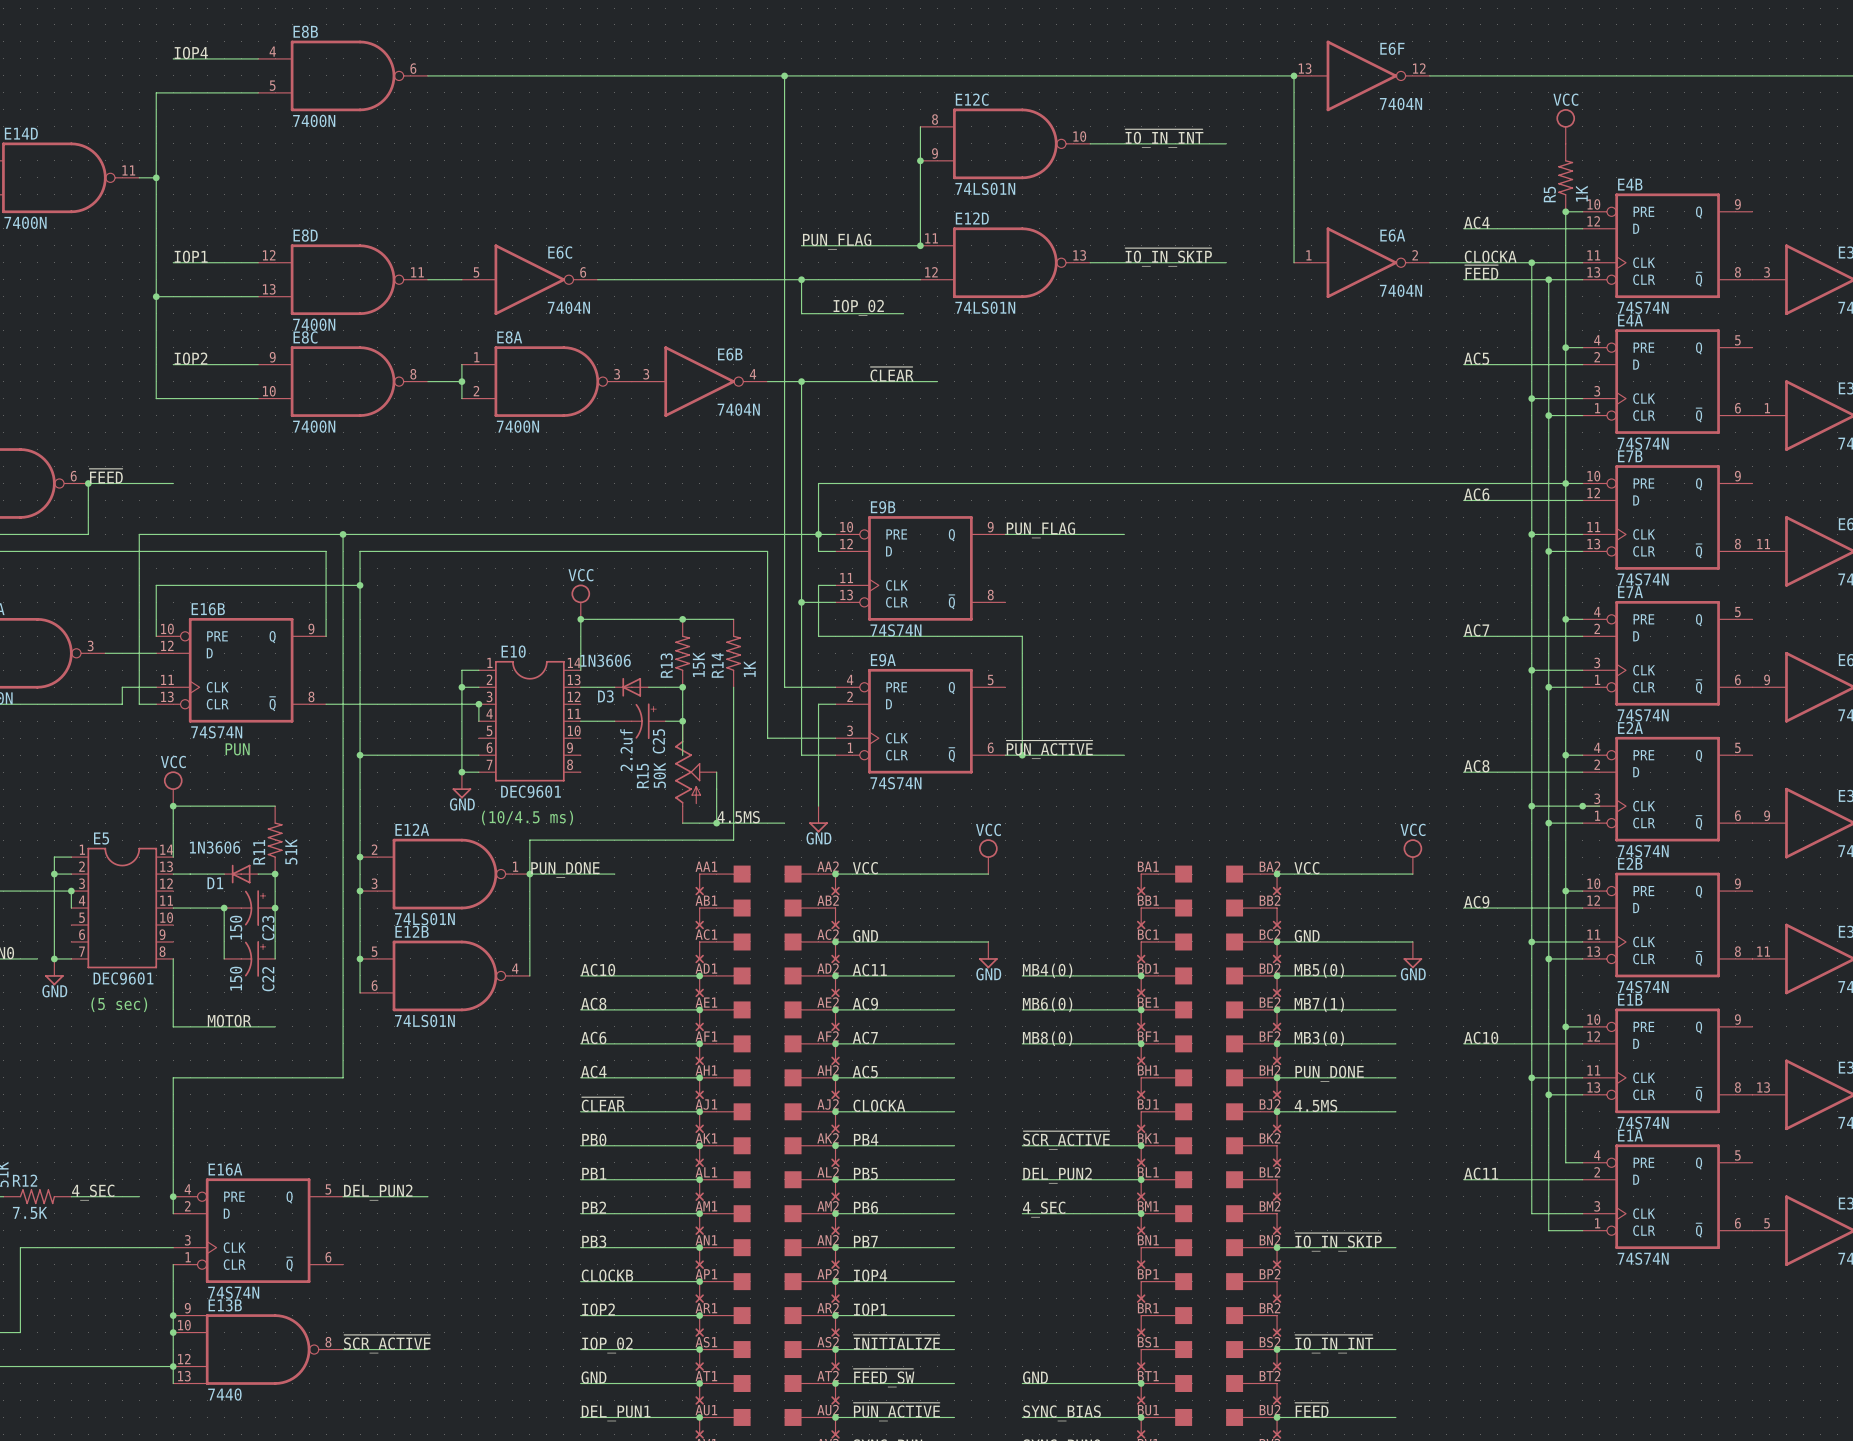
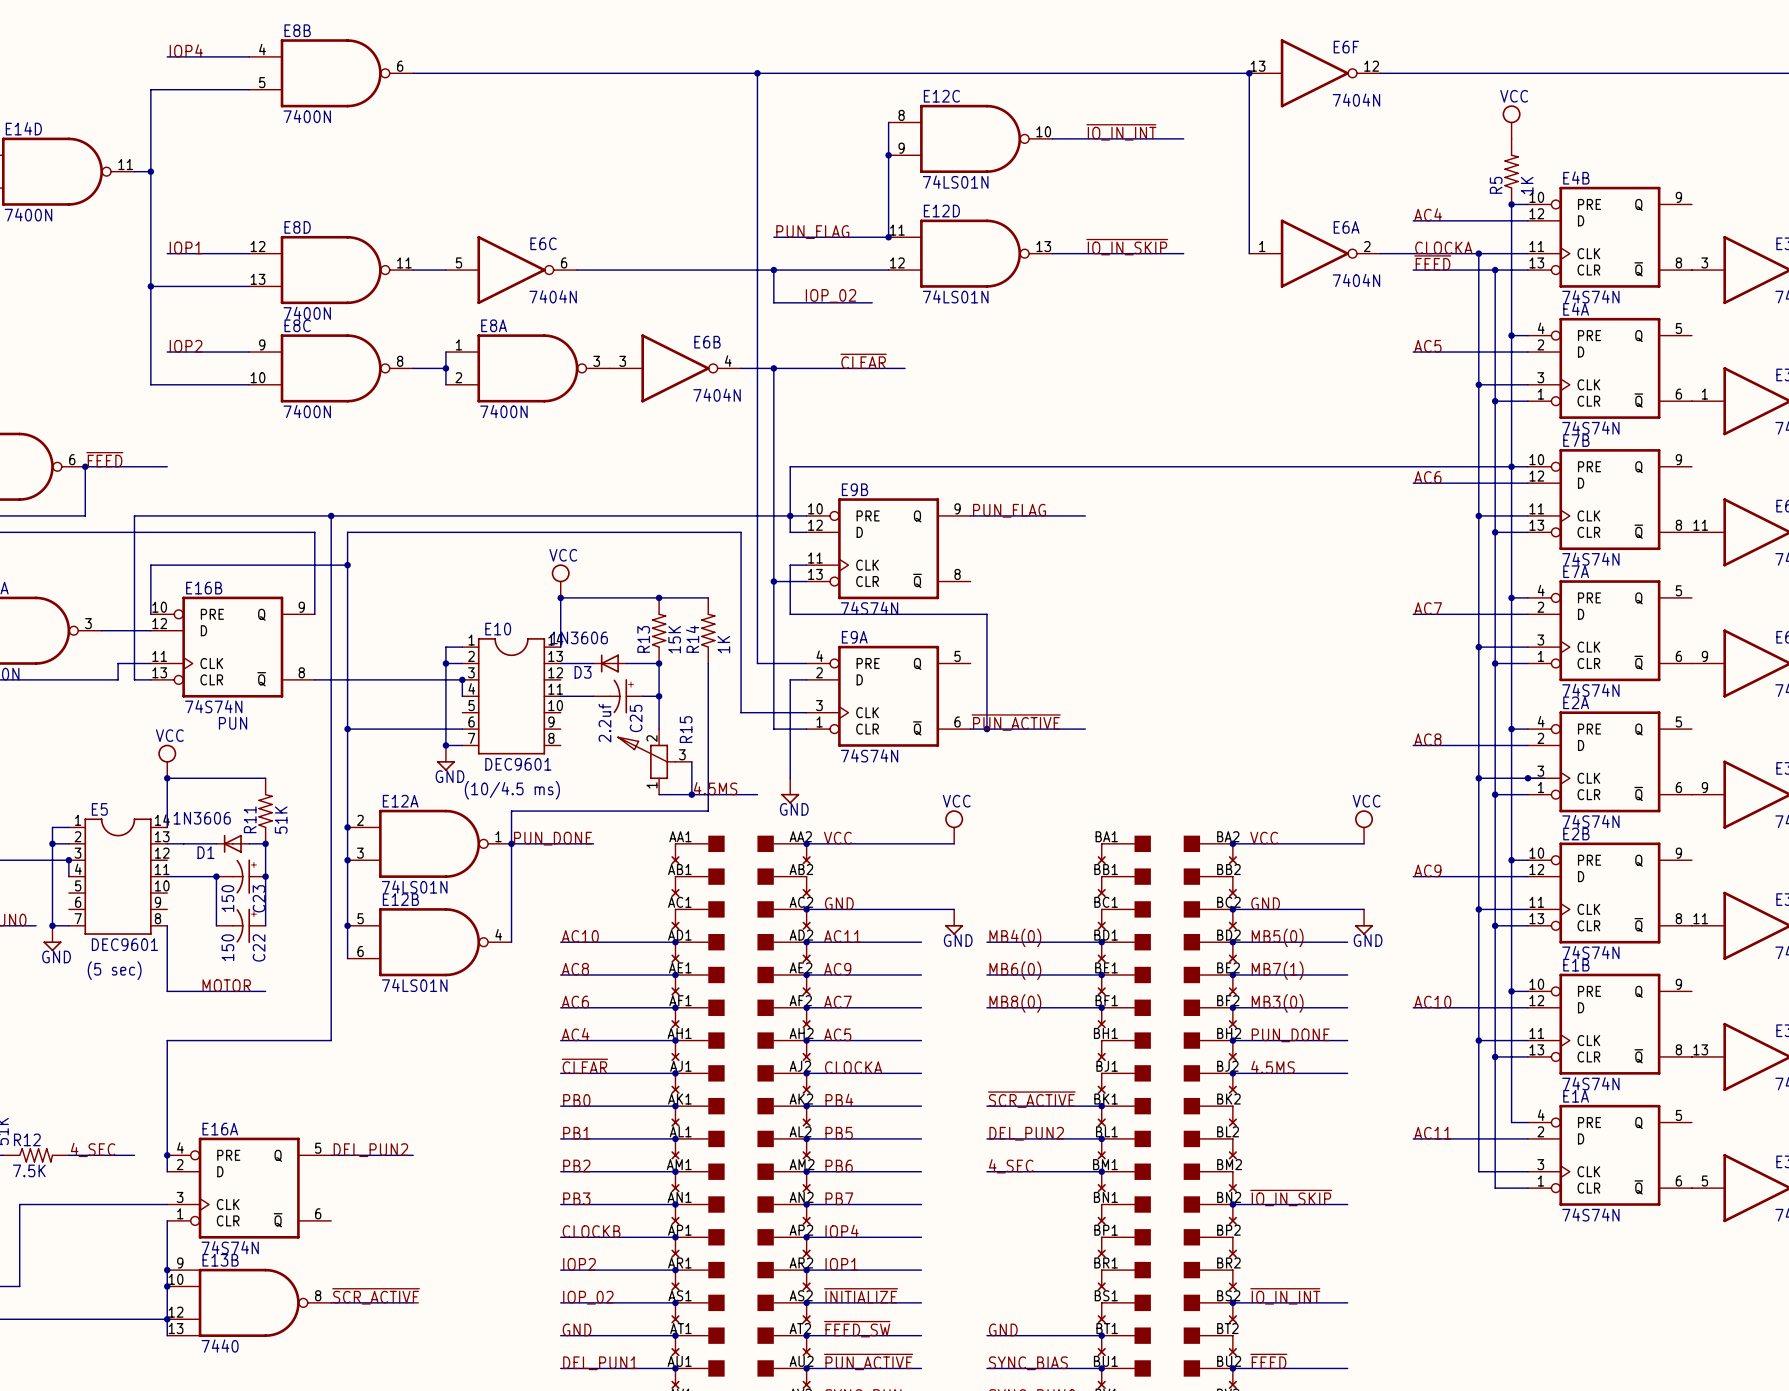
R15 symbol: [675, 721, 717, 824] -> [617, 729, 692, 795]
wire: (716, 772) (716, 789) -> none
R15 name position: R15 (642, 775) -> R15 (686, 729)
R15 value: 50K (659, 775) -> none

